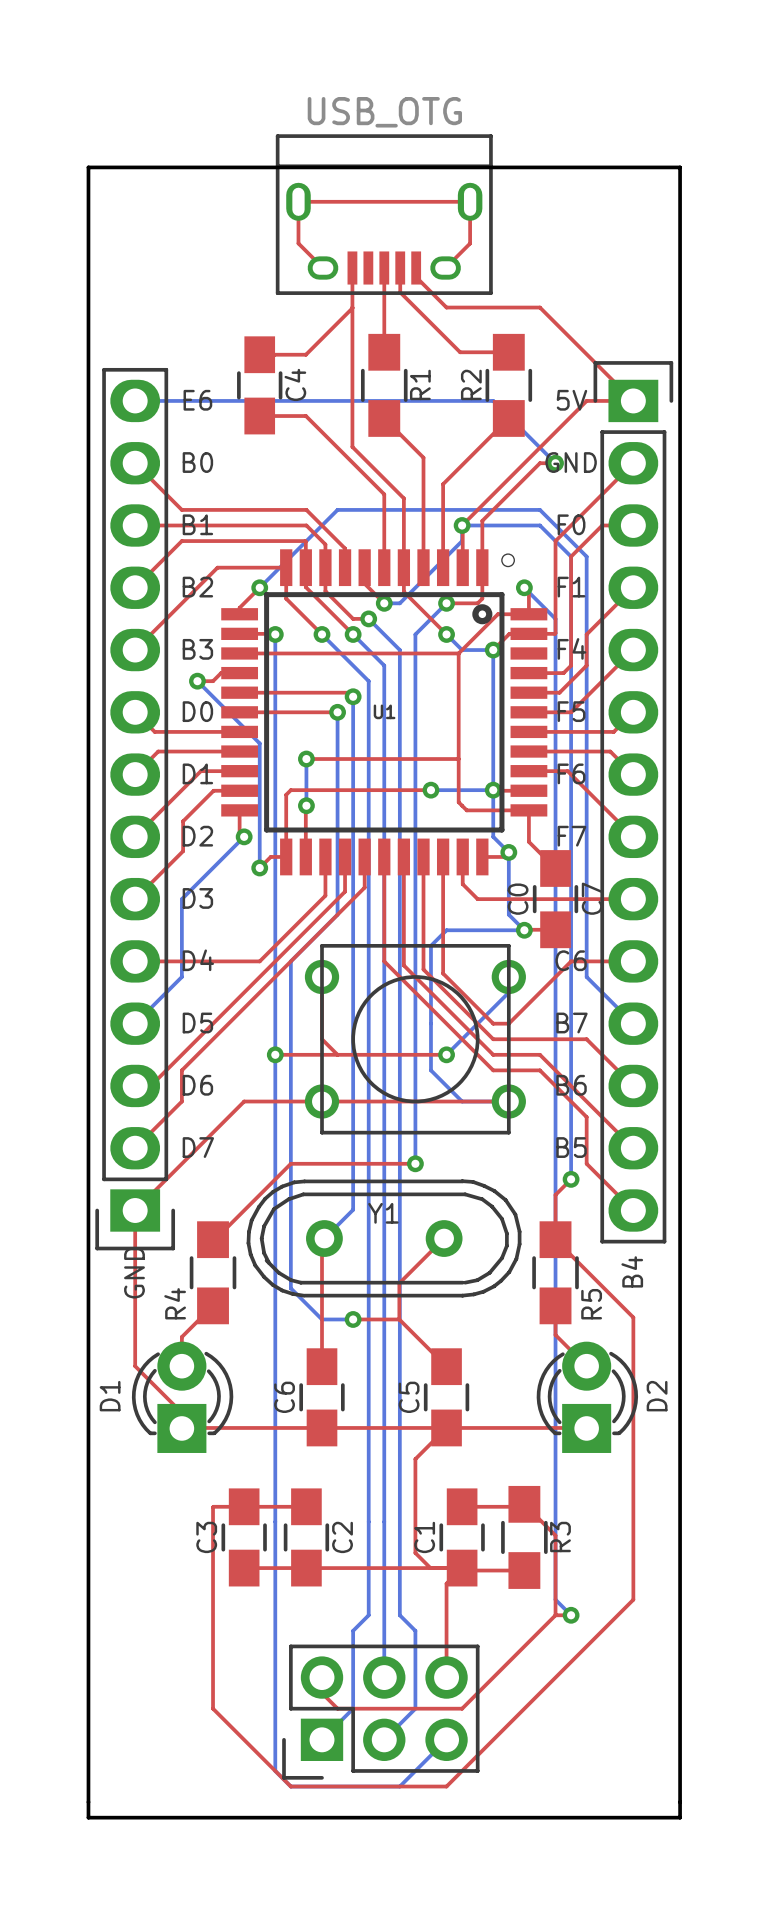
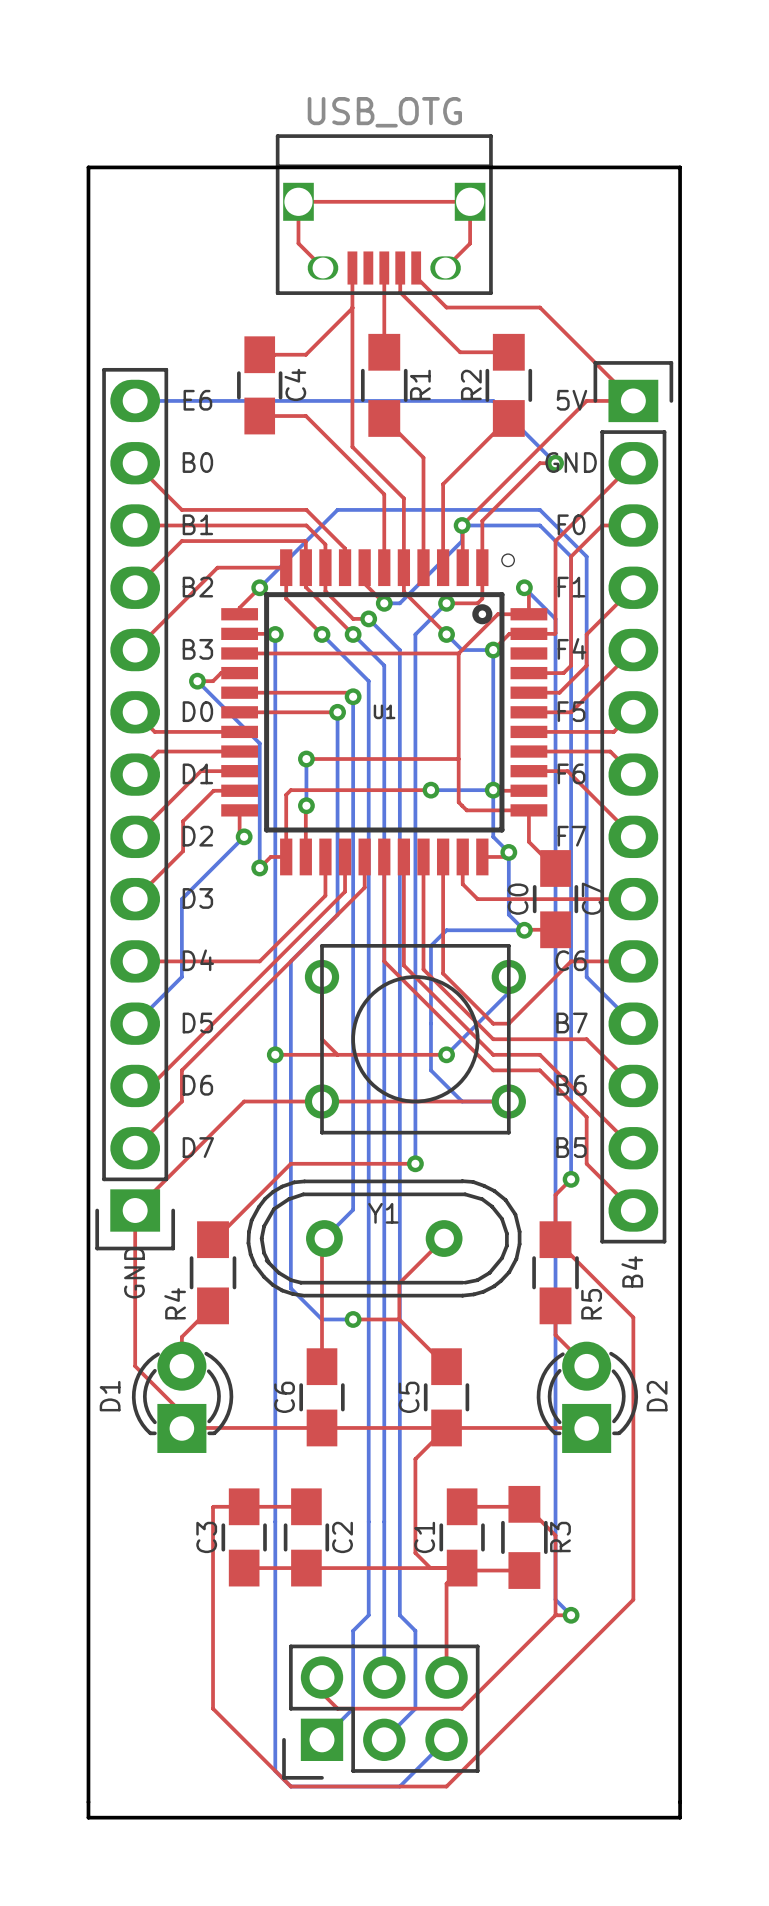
part footprint: [275, 134, 493, 295] -> [275, 134, 493, 295]

